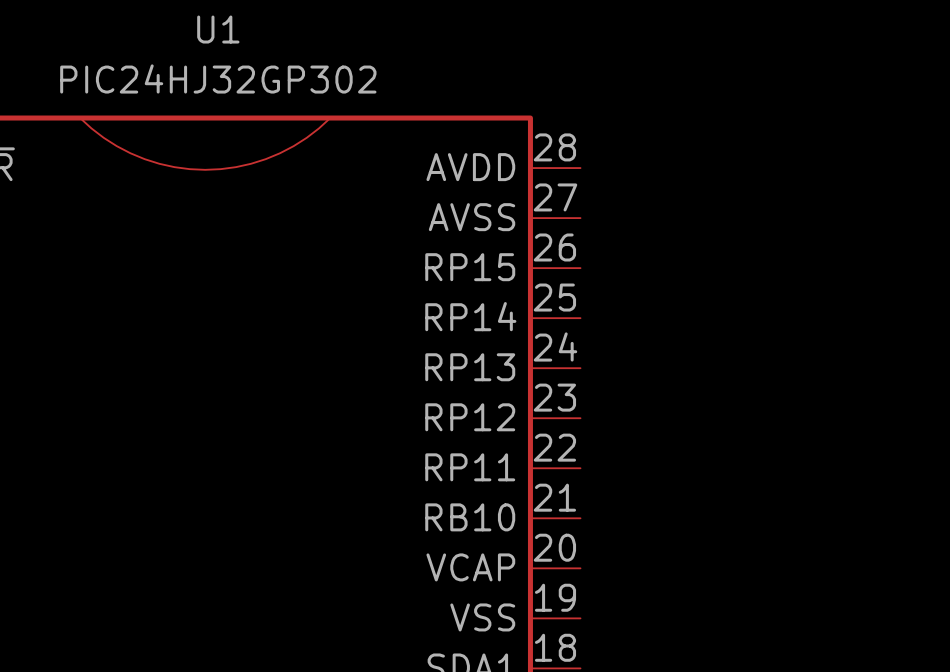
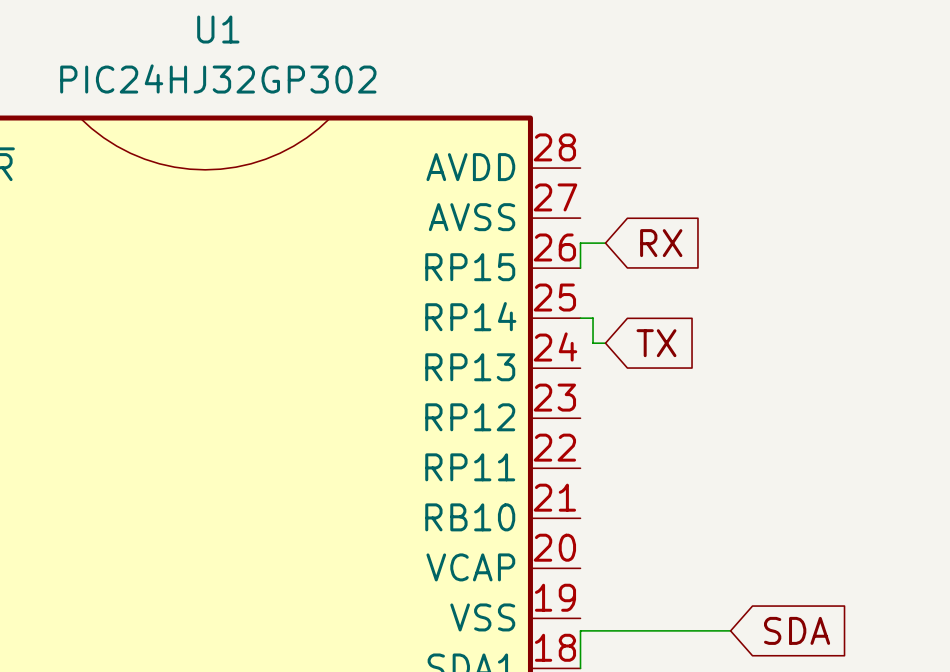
wire: none -> (605, 243) (580, 243) (580, 268)
global label: none -> RX (661, 243)
wire: none -> (580, 318) (593, 318) (593, 343) (605, 343)
global label: none -> TX (656, 343)
wire: none -> (730, 630) (580, 630) (580, 668)
global label: none -> SDA (797, 630)

